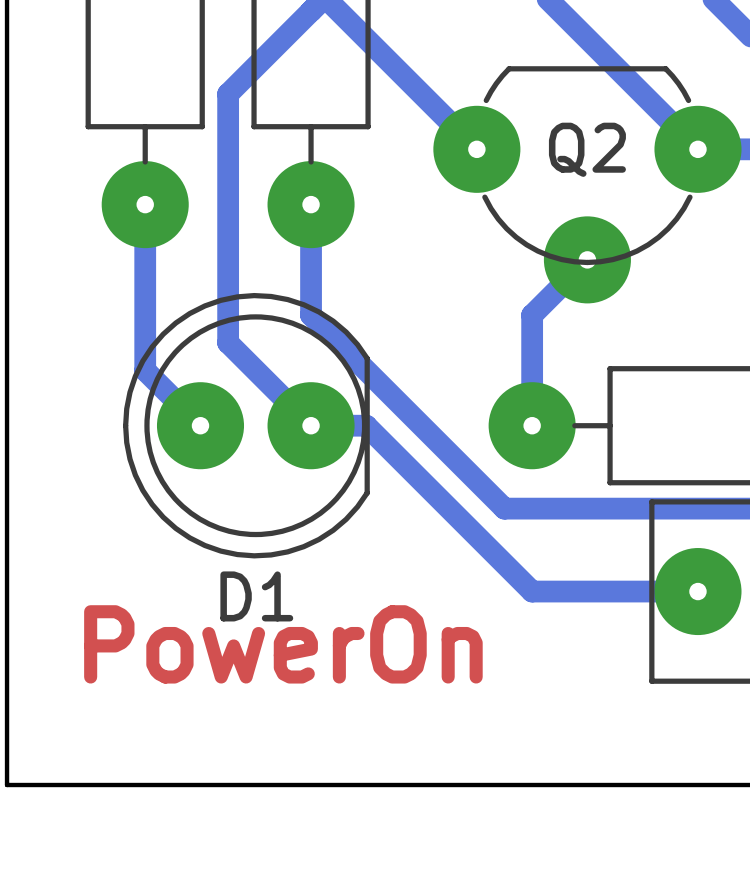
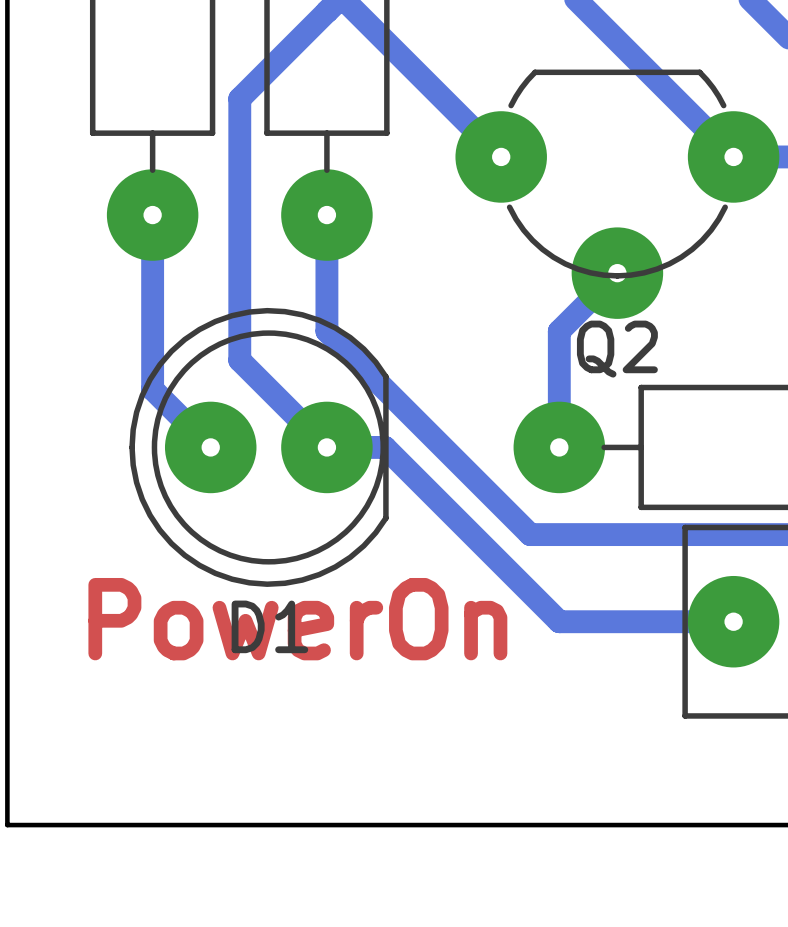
Q2 name position: Q2 (587, 149) -> Q2 (617, 349)
text position: PowerOn (283, 644) -> PowerOn (297, 619)

